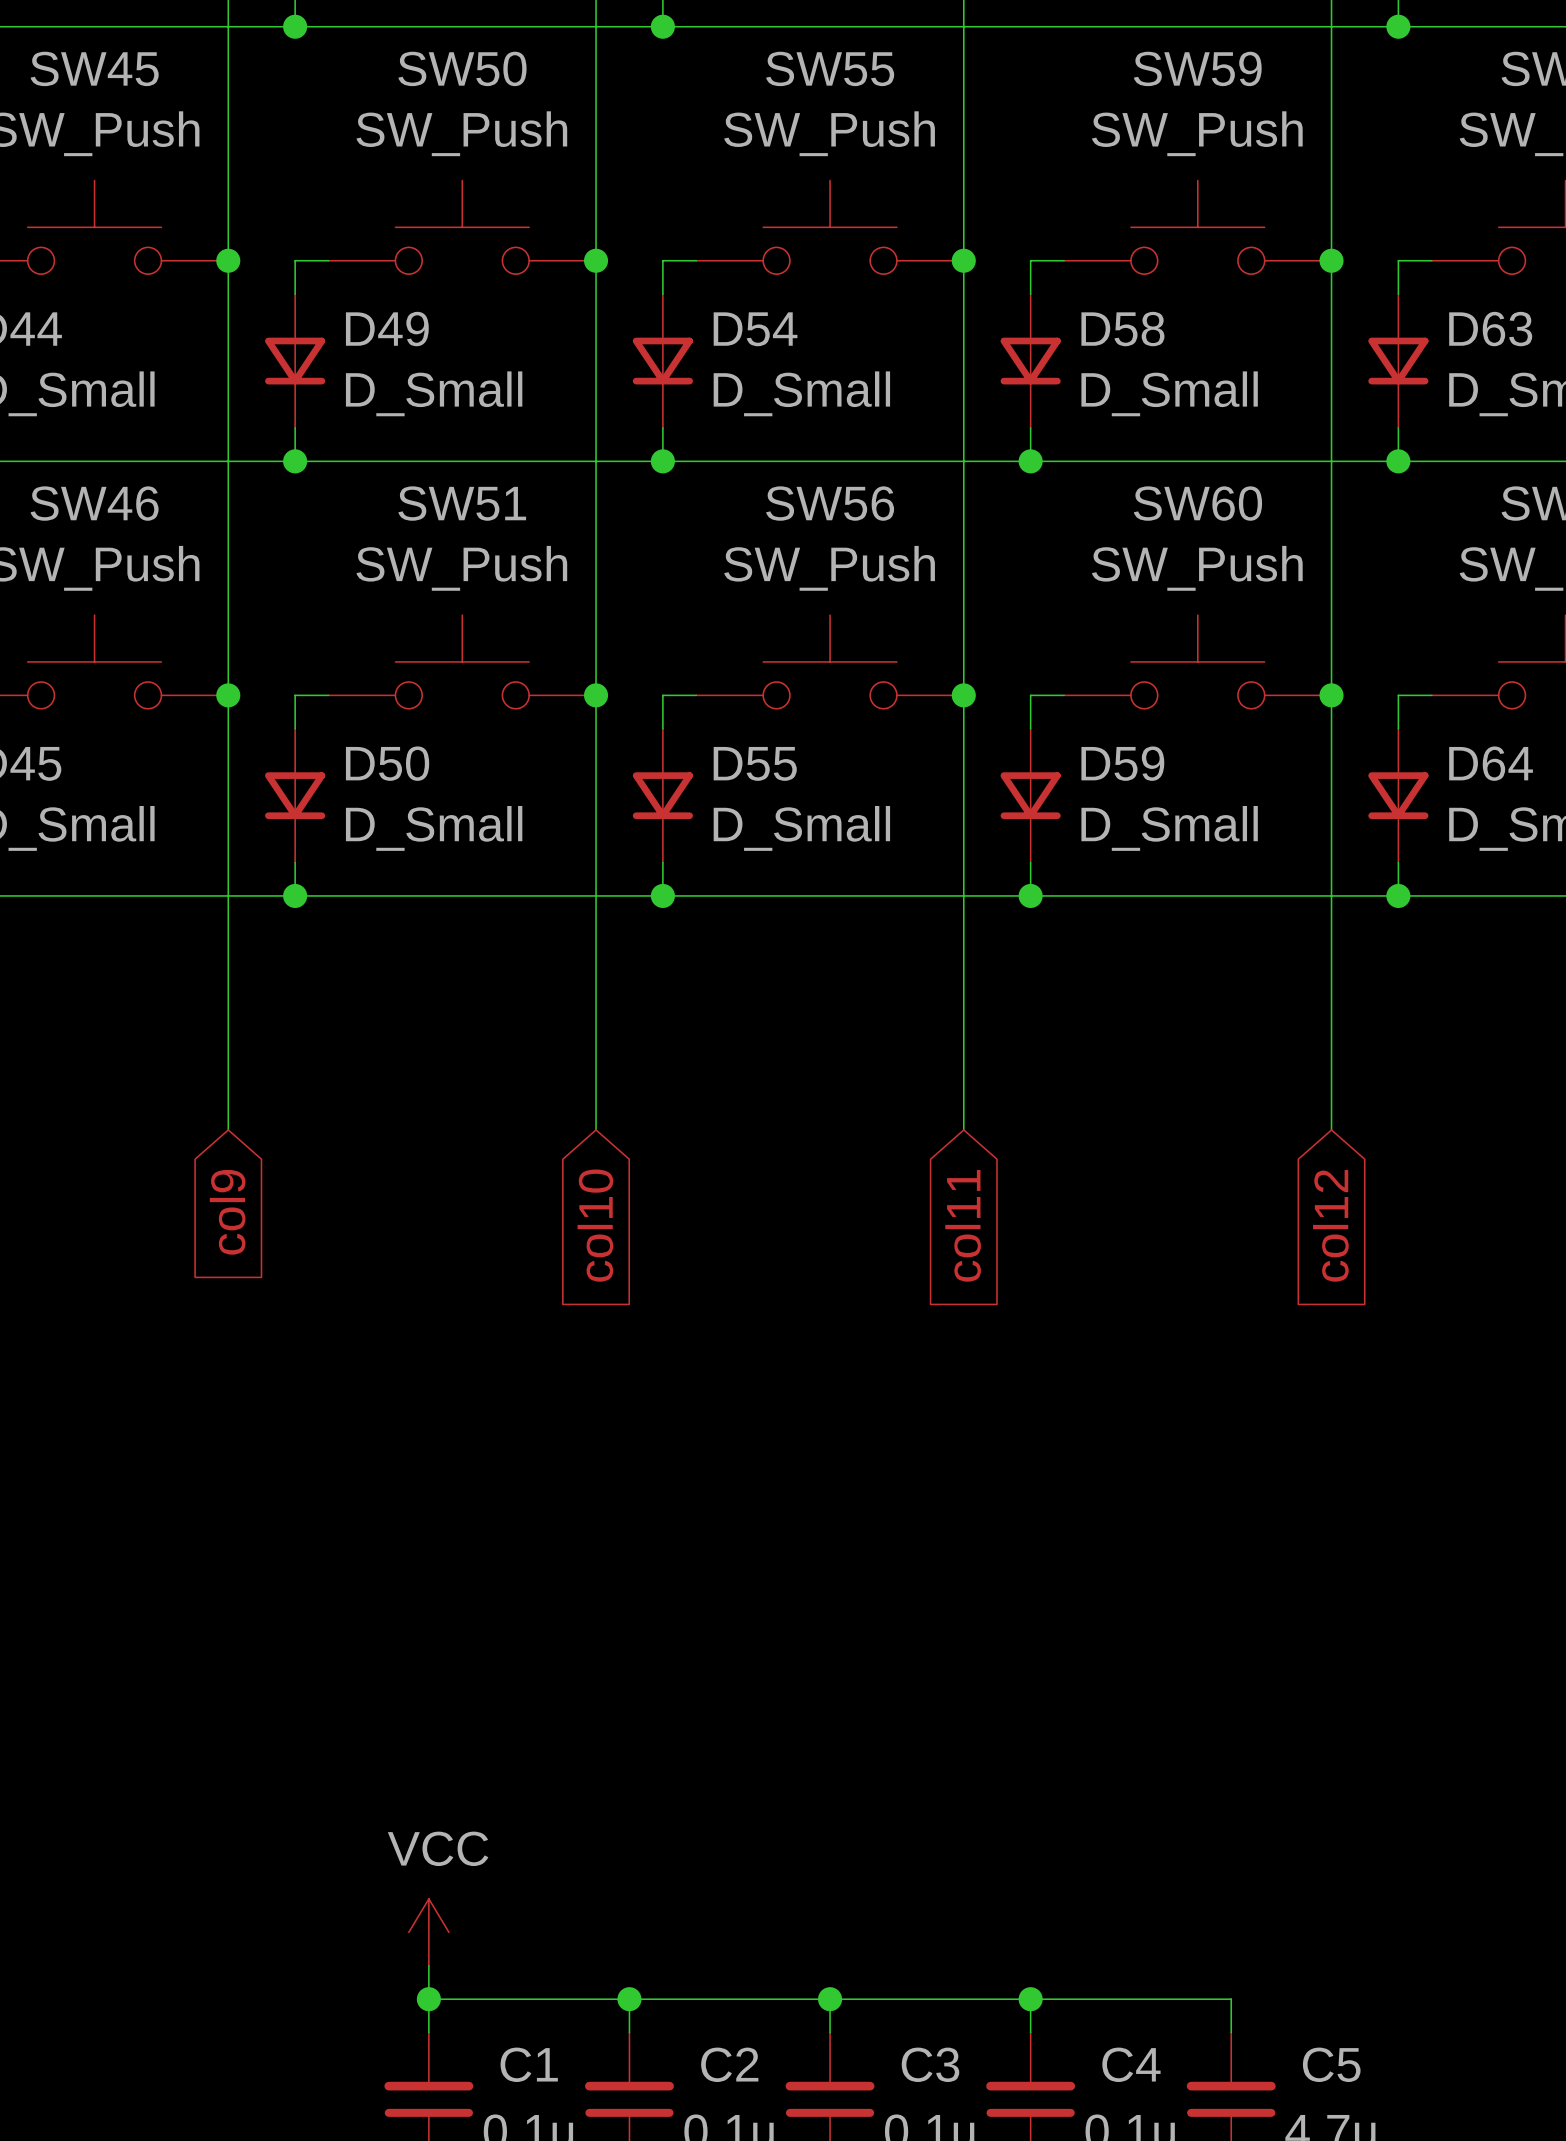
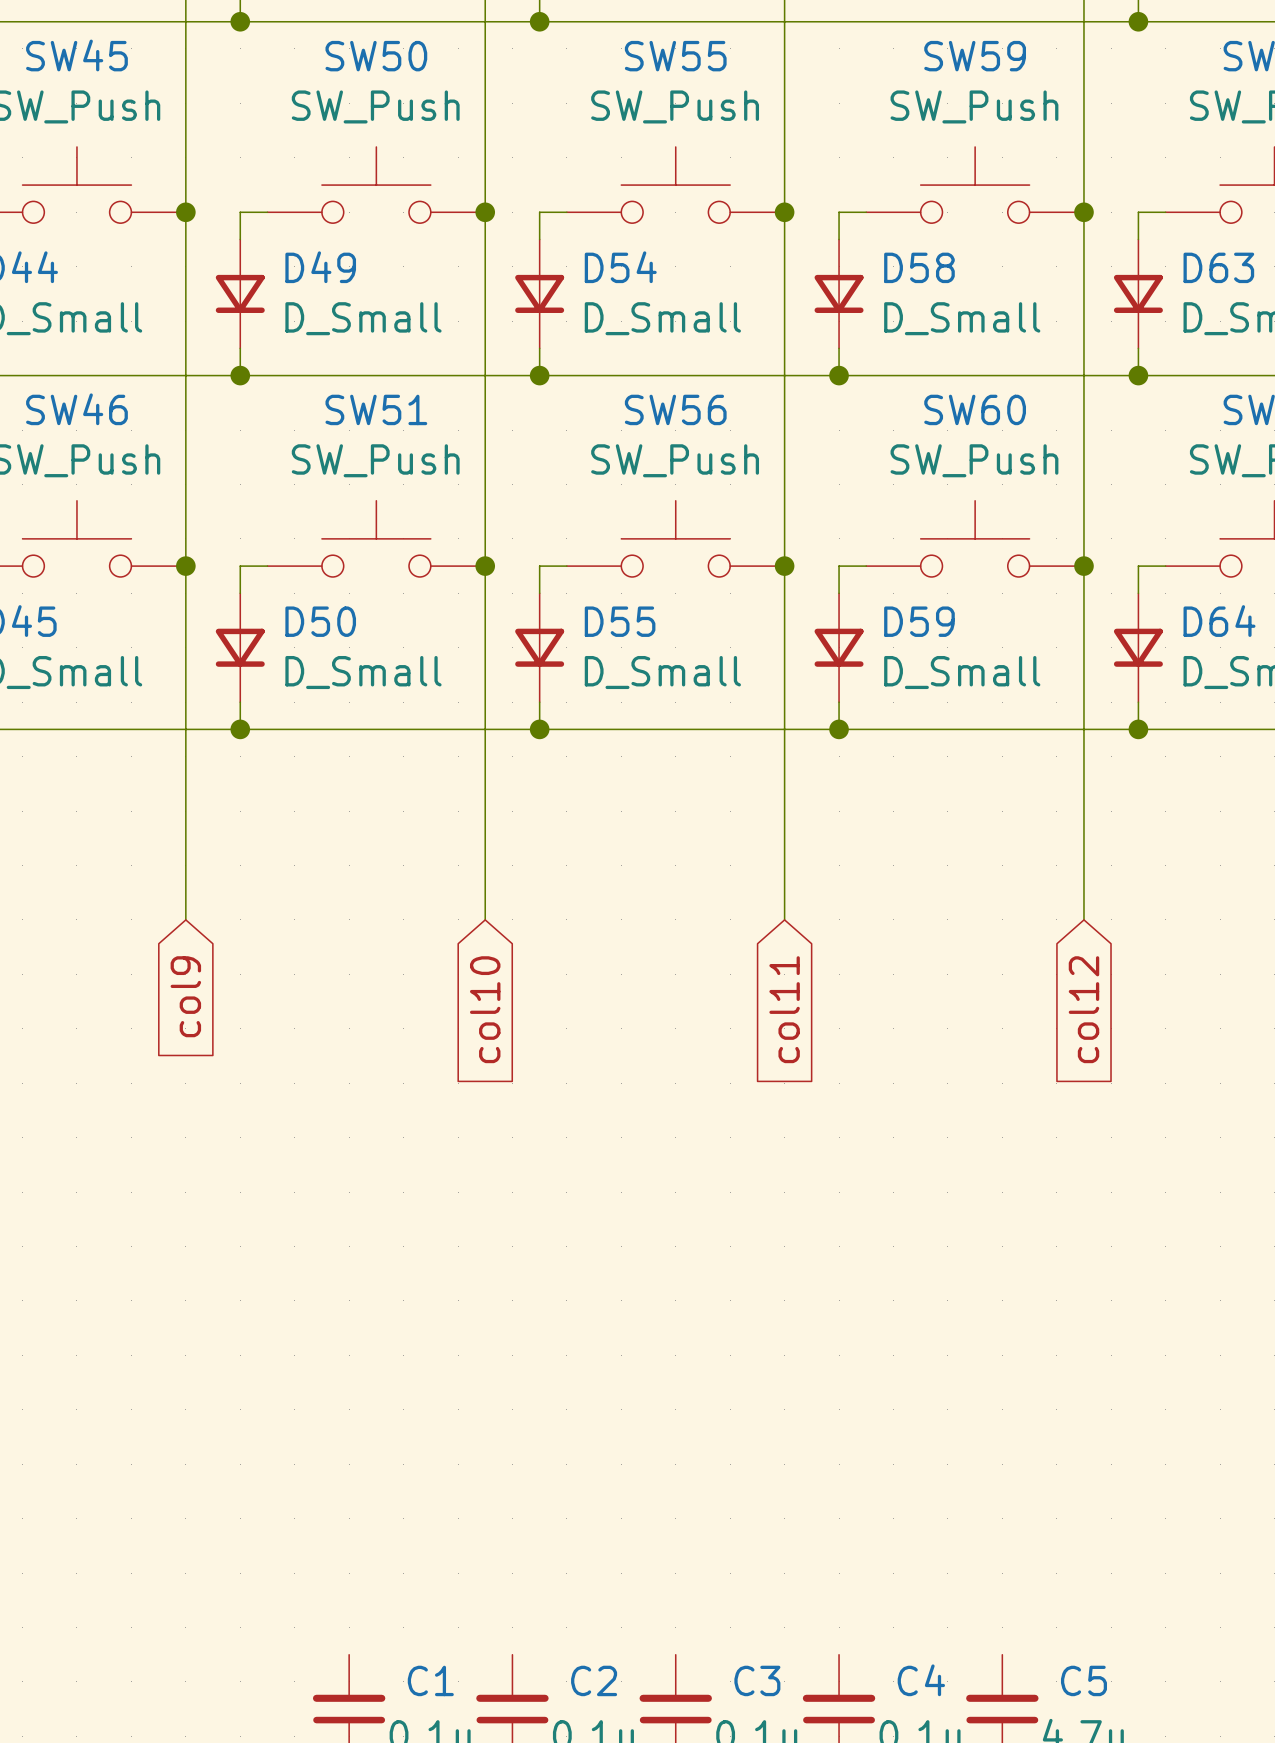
power symbol: VCC (428, 1932) -> none
wire: (428, 1965) (428, 2032) -> none
wire: (428, 1999) (1231, 1999) (1231, 2032) -> none
junction: (428, 1999) -> none
wire: (629, 1999) (629, 2032) -> none
junction: (629, 1999) -> none
wire: (830, 1999) (830, 2032) -> none
junction: (830, 1999) -> none
wire: (1030, 1999) (1030, 2032) -> none
junction: (1030, 1999) -> none

